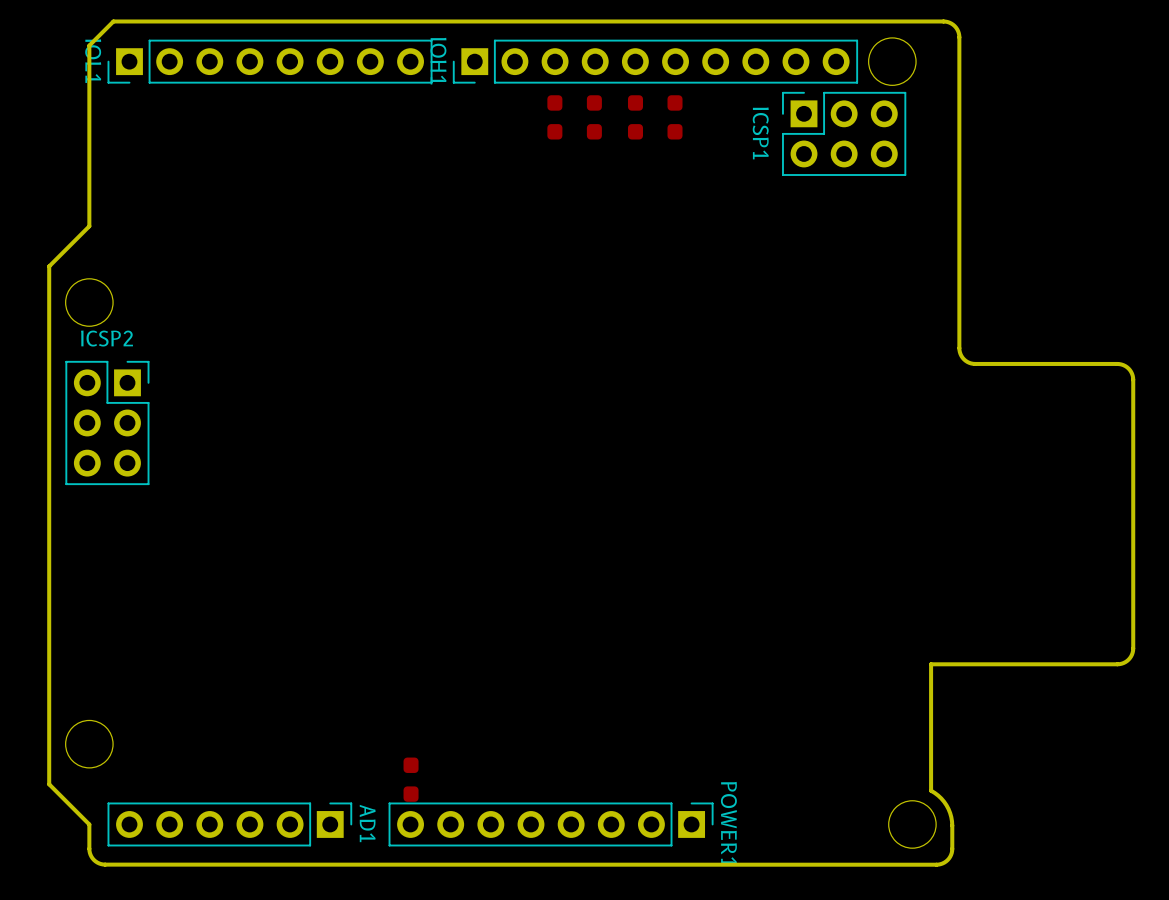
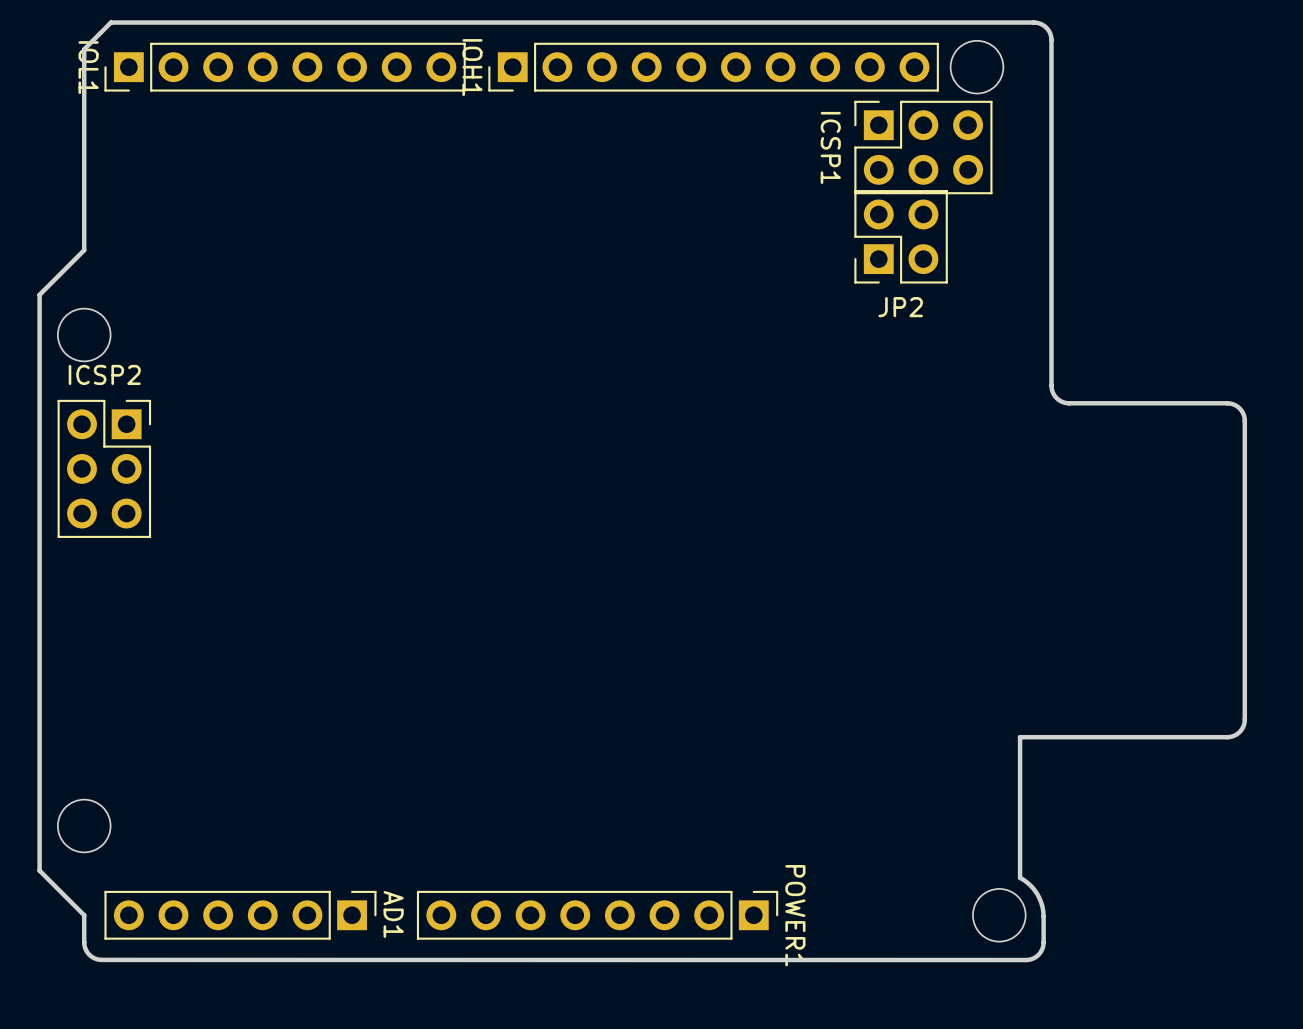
part: (554, 117) -> none
part: (594, 117) -> none
part: (635, 117) -> none
part: (675, 117) -> none
JP2: none -> (901, 236)
part: (411, 779) -> none

